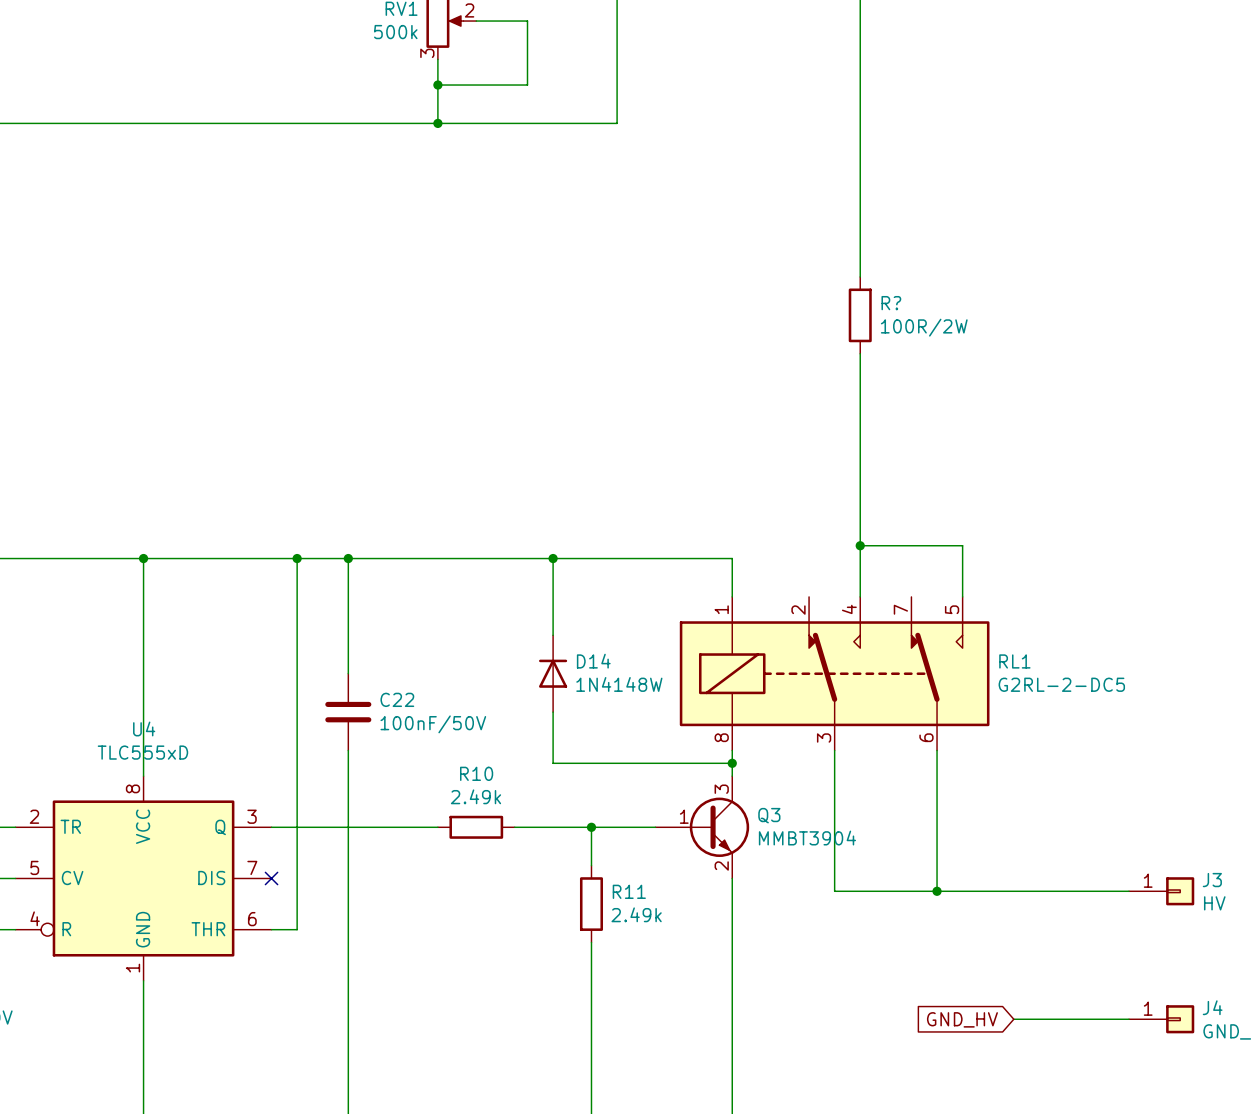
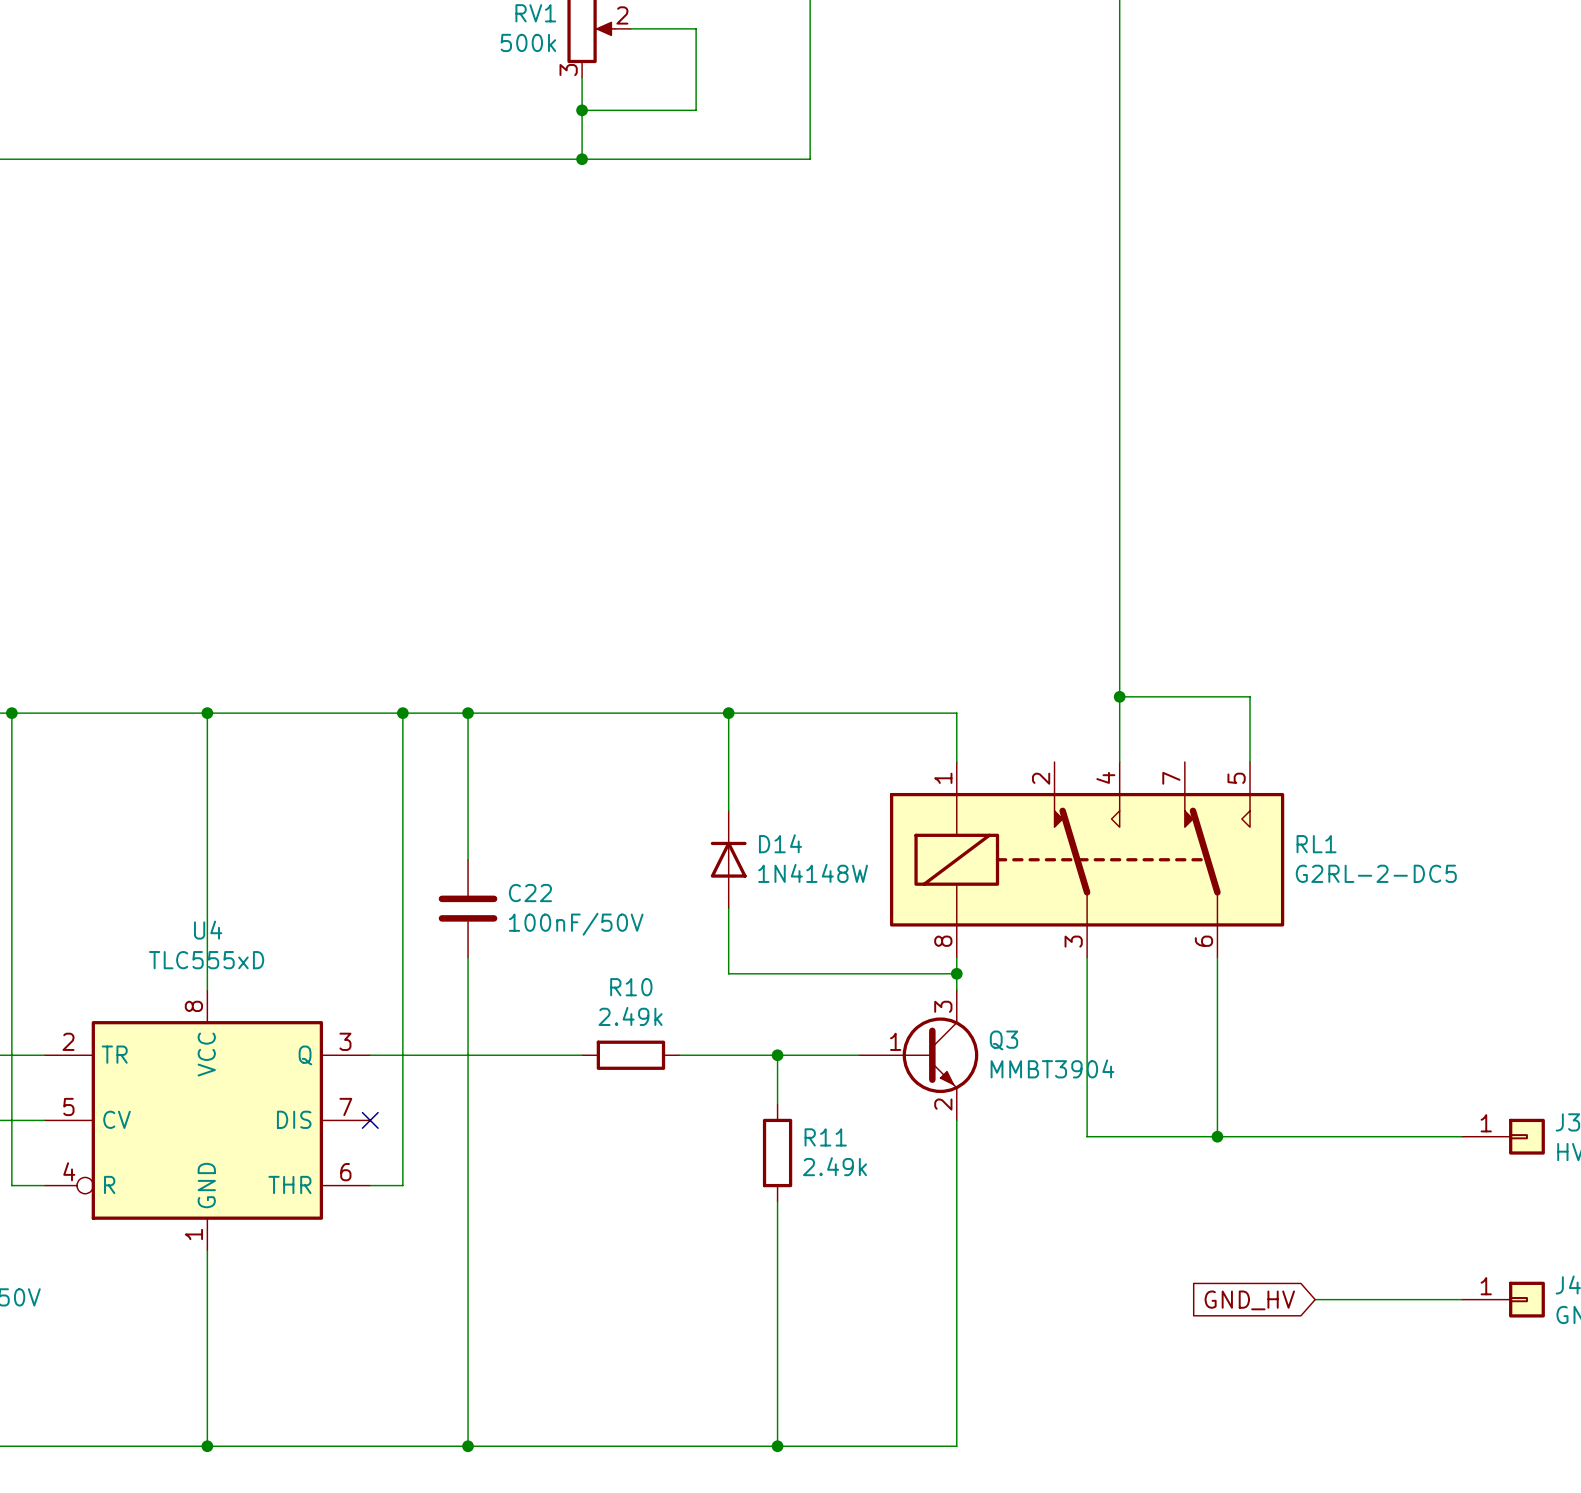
wire: none -> (1119, 354) (1119, 452)
R?: 100R/2W (860, 315) -> none

